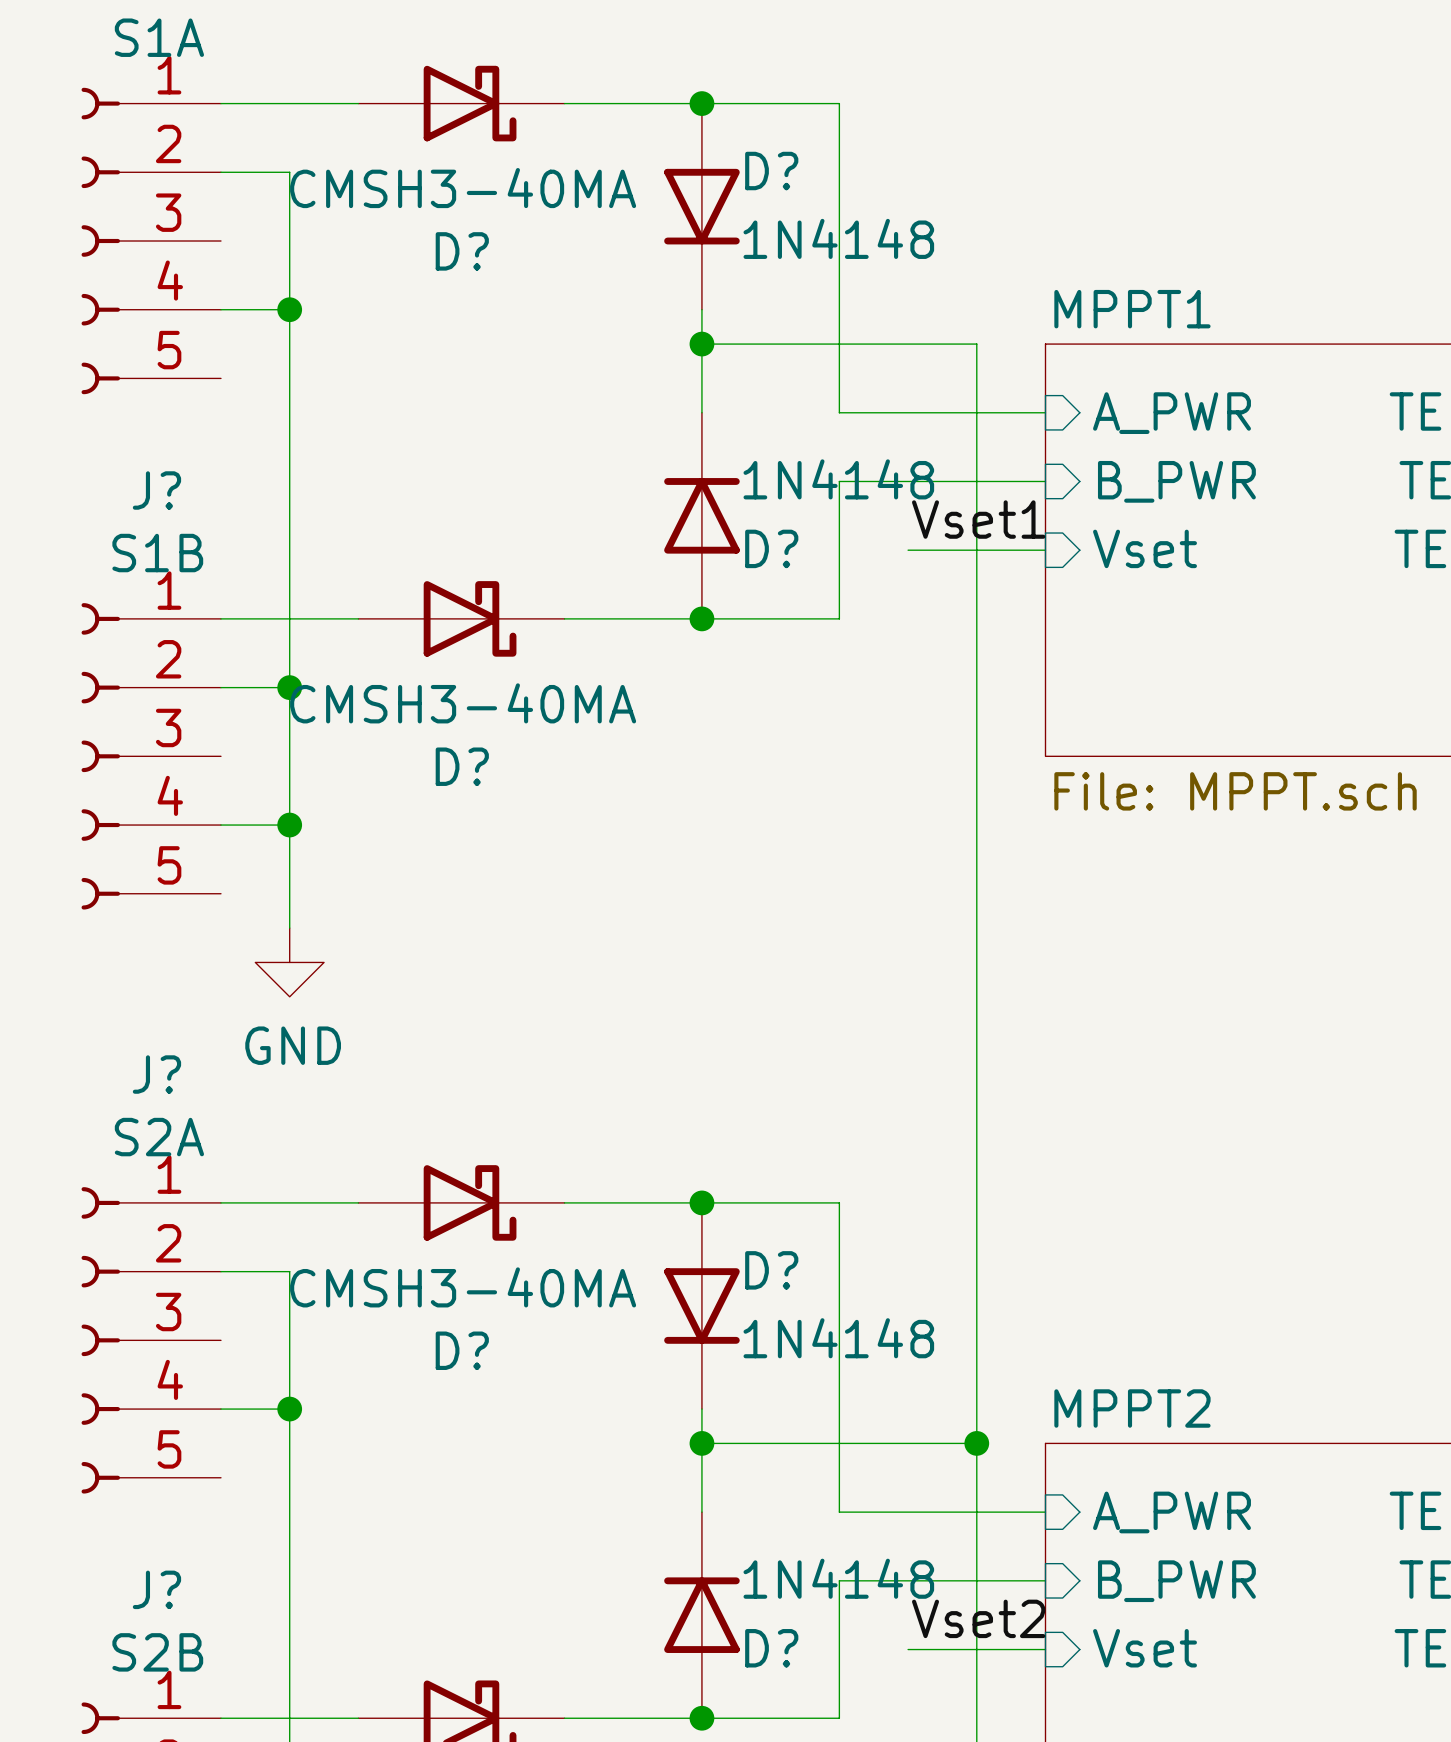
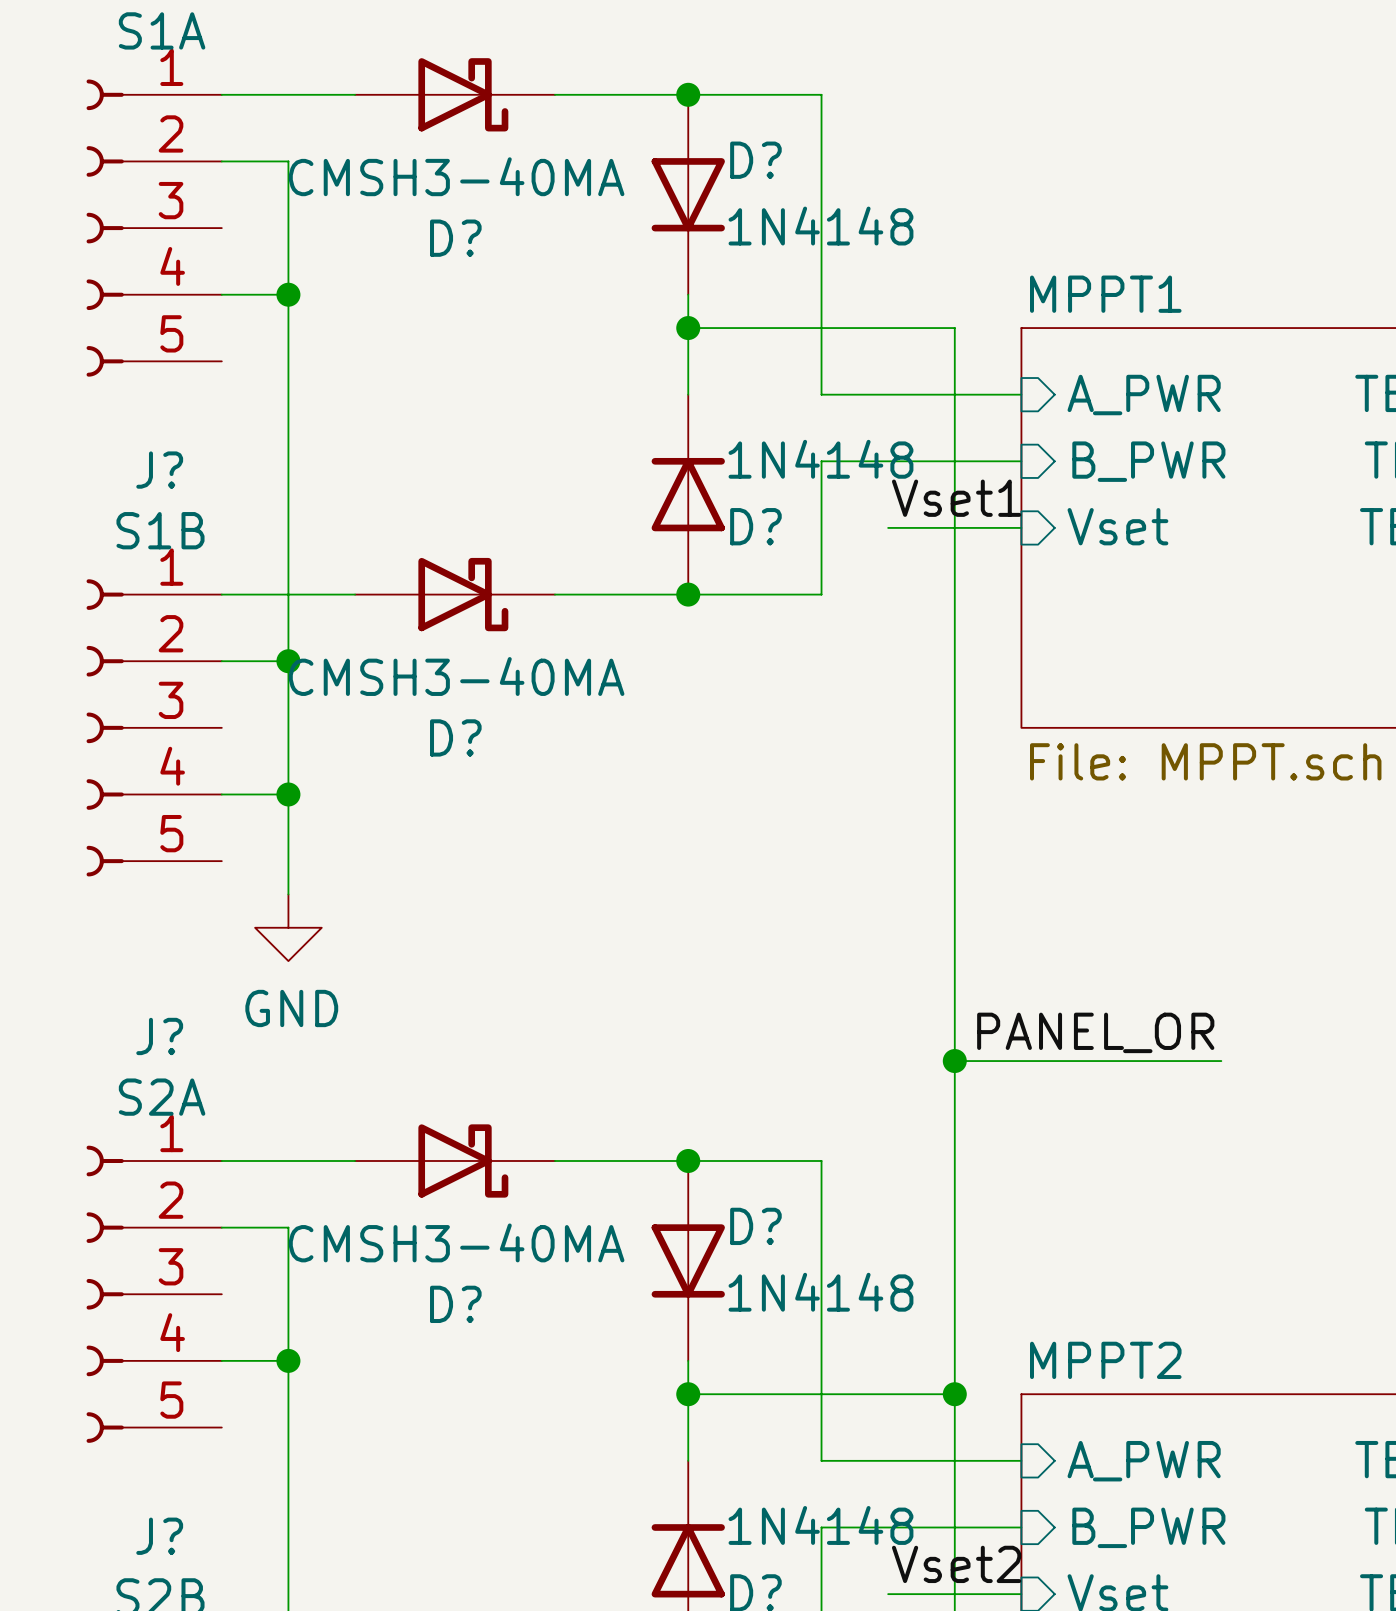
label: none -> PANEL_OR (1095, 1032)
wire: none -> (954, 1061) (1221, 1061)
junction: none -> (954, 1061)

